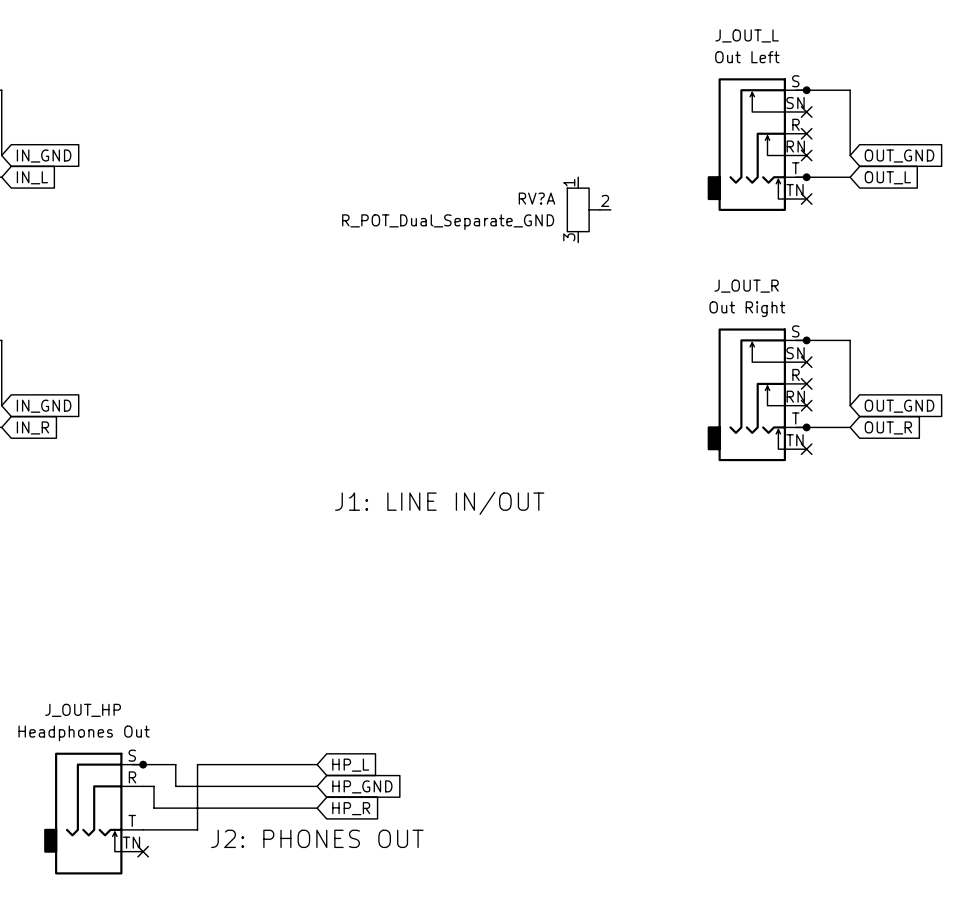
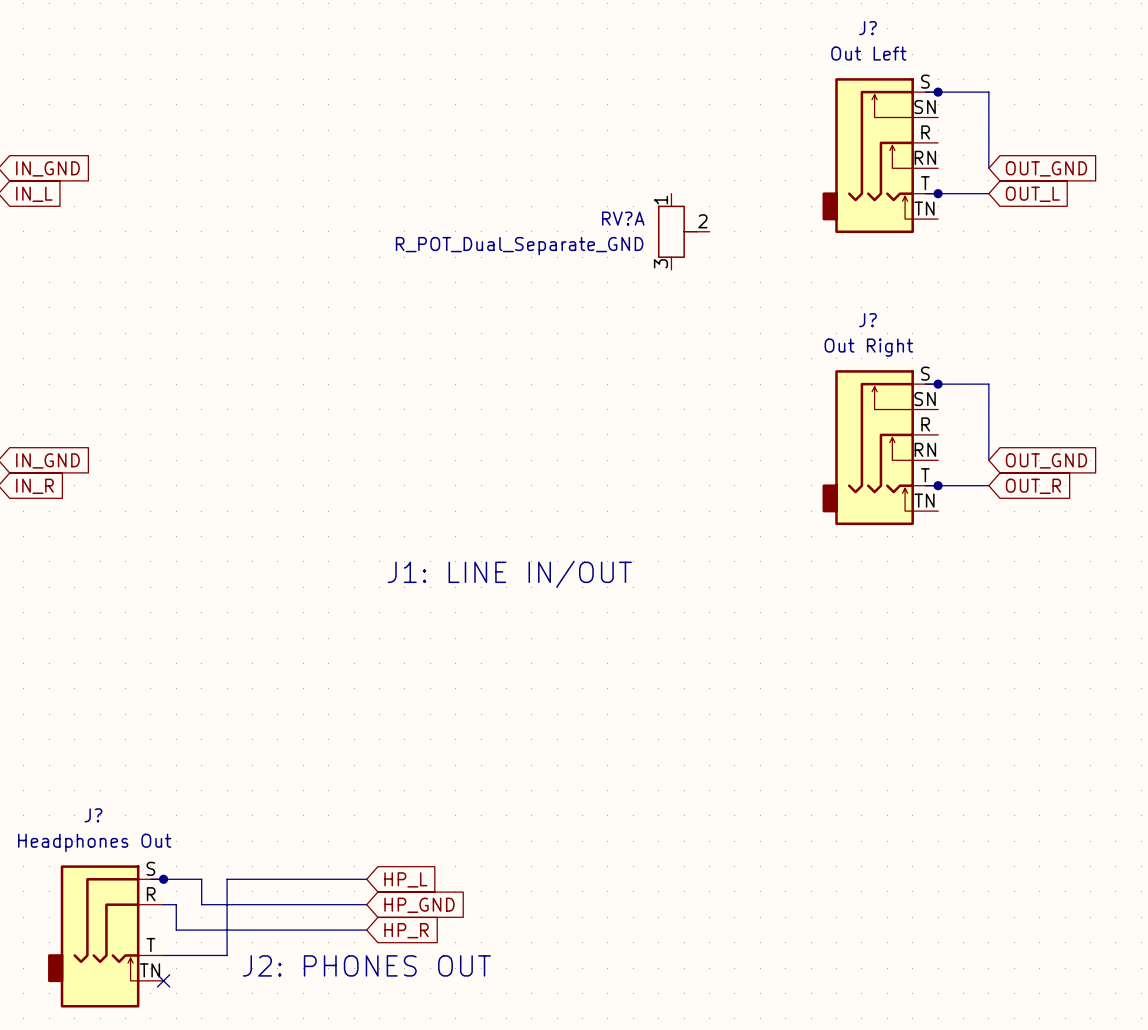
J_OUT_L name: J_OUT_L (747, 35) -> J? (867, 28)
no-connect mark: (806, 111) -> none
no-connect mark: (806, 133) -> none
no-connect mark: (806, 155) -> none
no-connect mark: (806, 199) -> none
J_OUT_R name: J_OUT_R (746, 286) -> J? (867, 320)
no-connect mark: (806, 362) -> none
no-connect mark: (806, 383) -> none
no-connect mark: (806, 405) -> none
no-connect mark: (806, 449) -> none
J_OUT_HP name: J_OUT_HP (83, 710) -> J? (93, 815)

